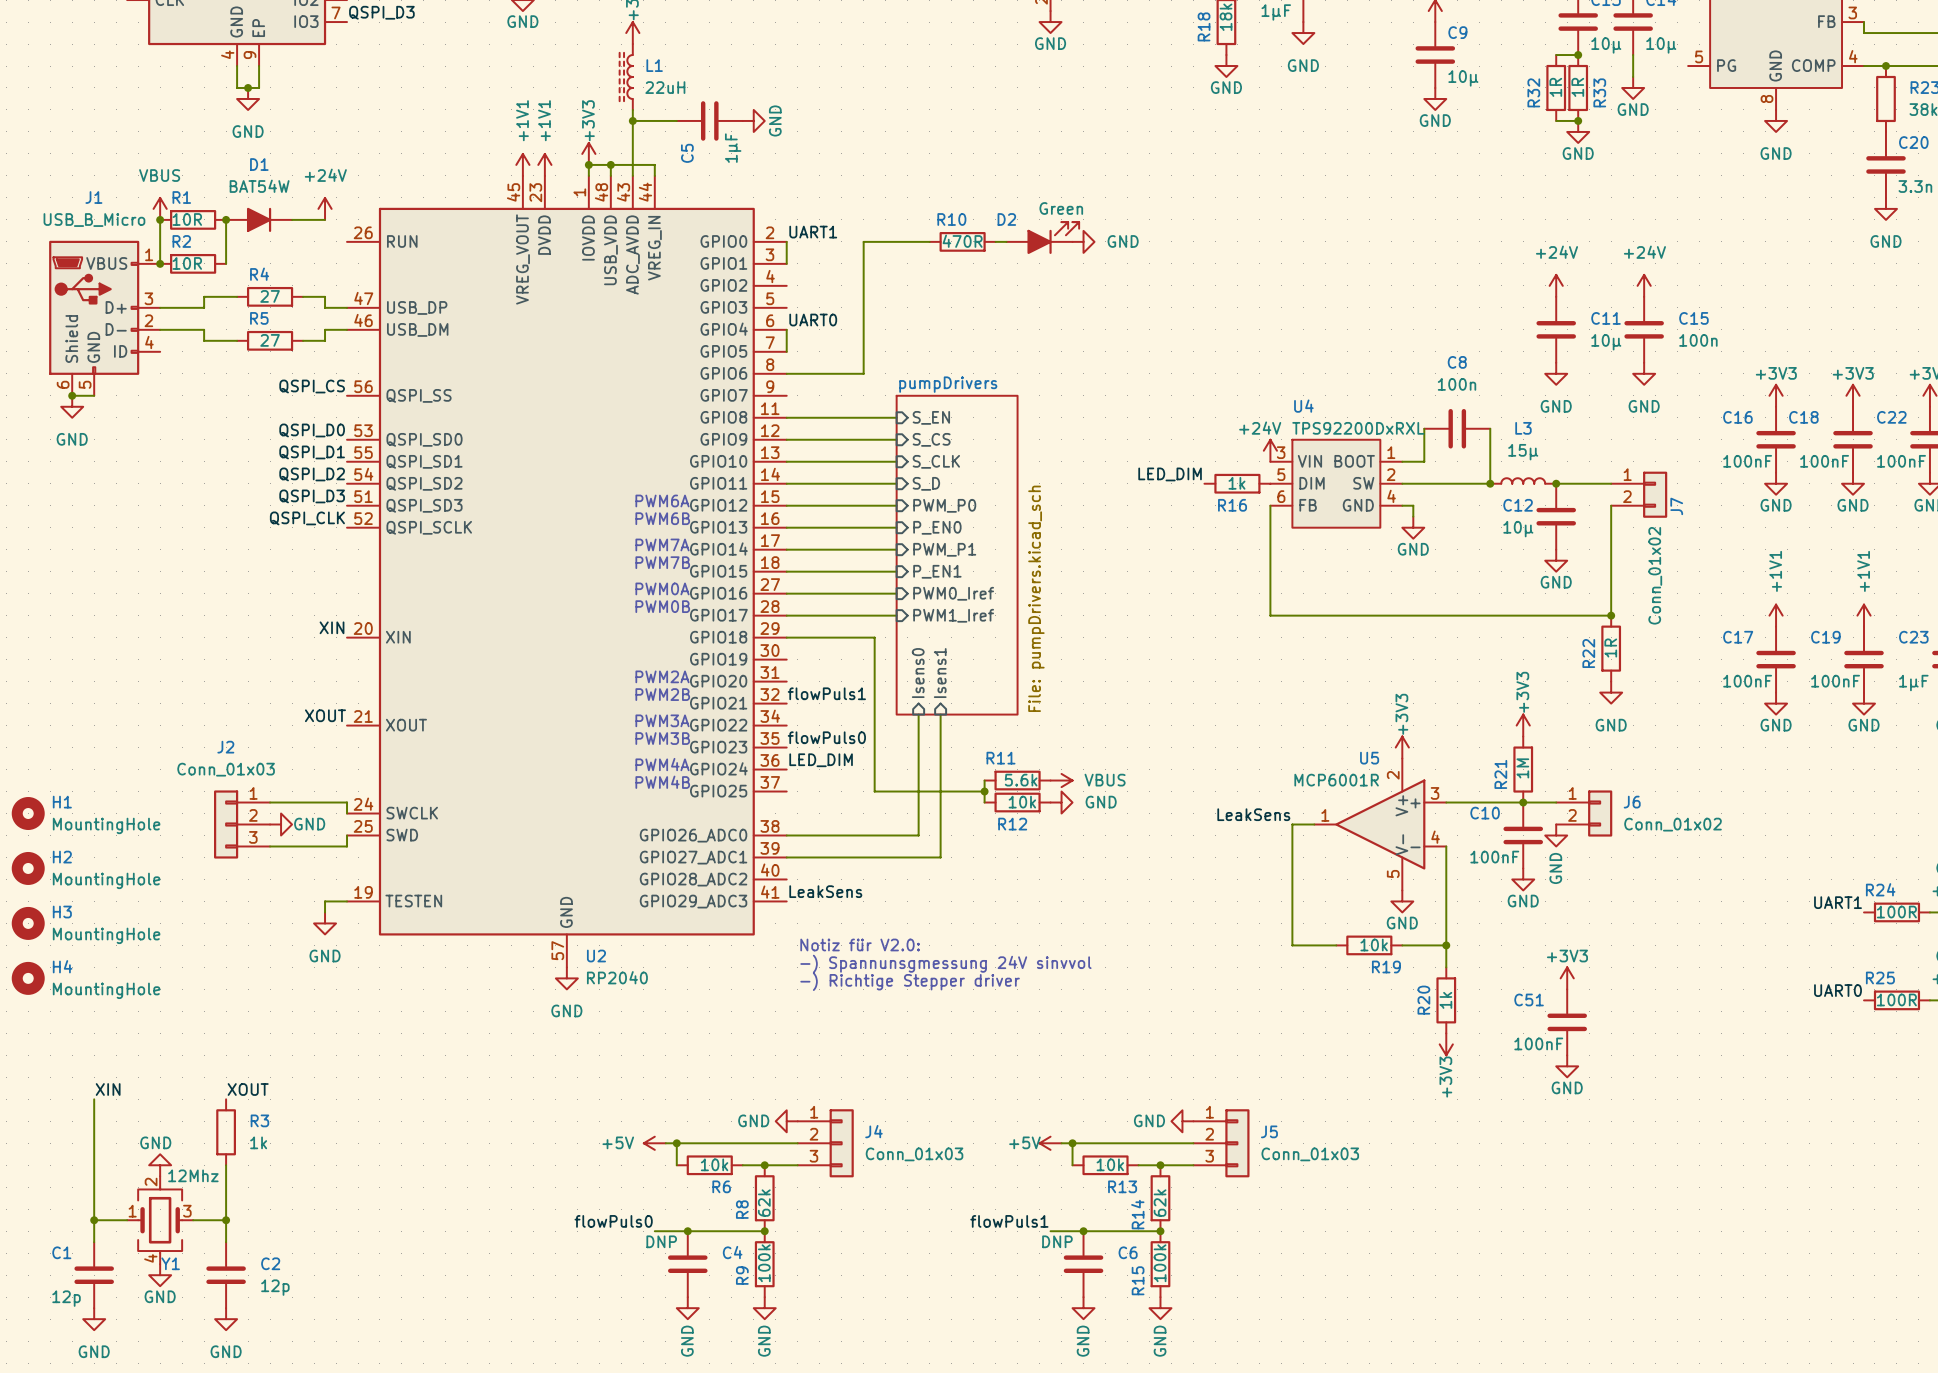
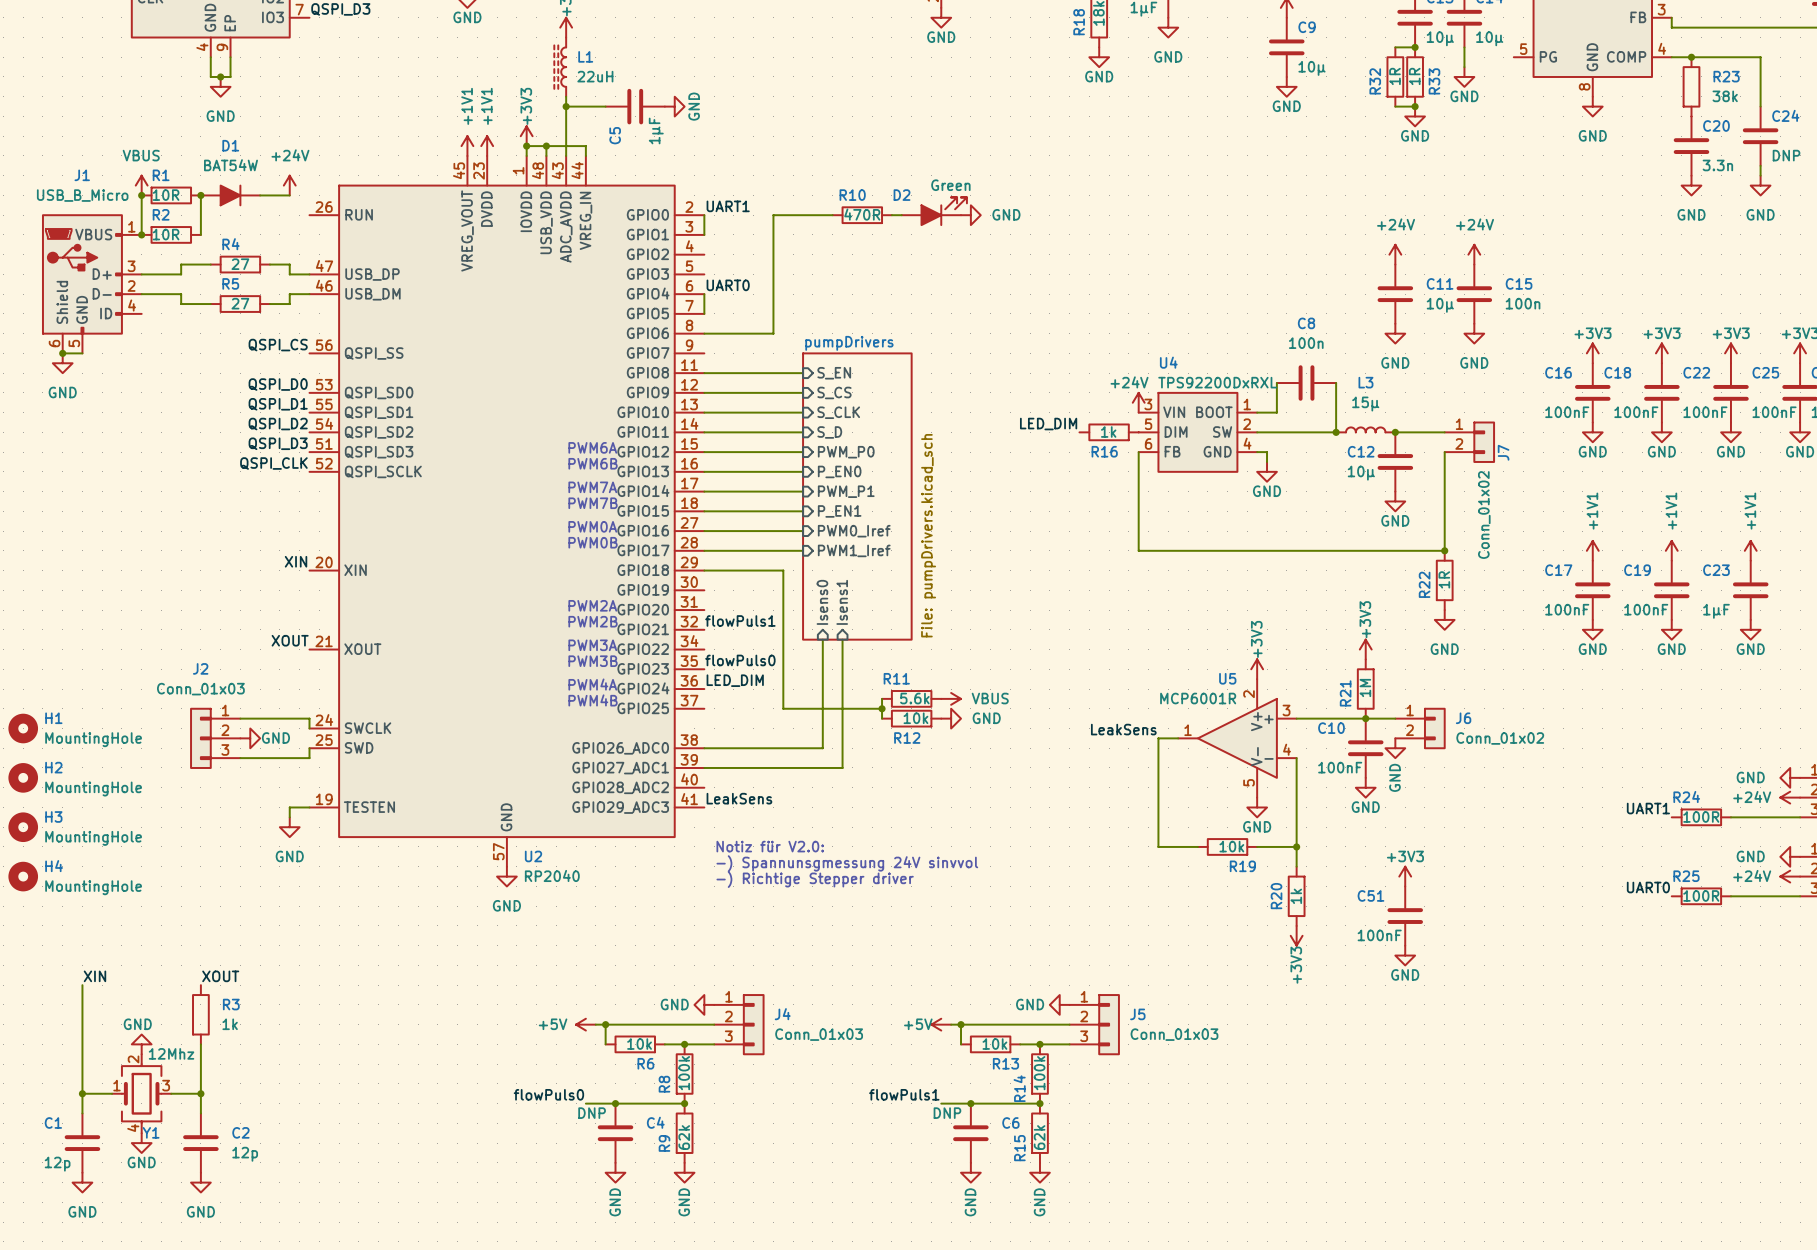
R8 value: 62k (764, 1203) -> 100k (684, 1073)
R14 value: 62k (1160, 1203) -> 100k (1039, 1073)
R9 value: 100k (764, 1263) -> 62k (684, 1137)
R15 value: 100k (1160, 1263) -> 62k (1039, 1137)

